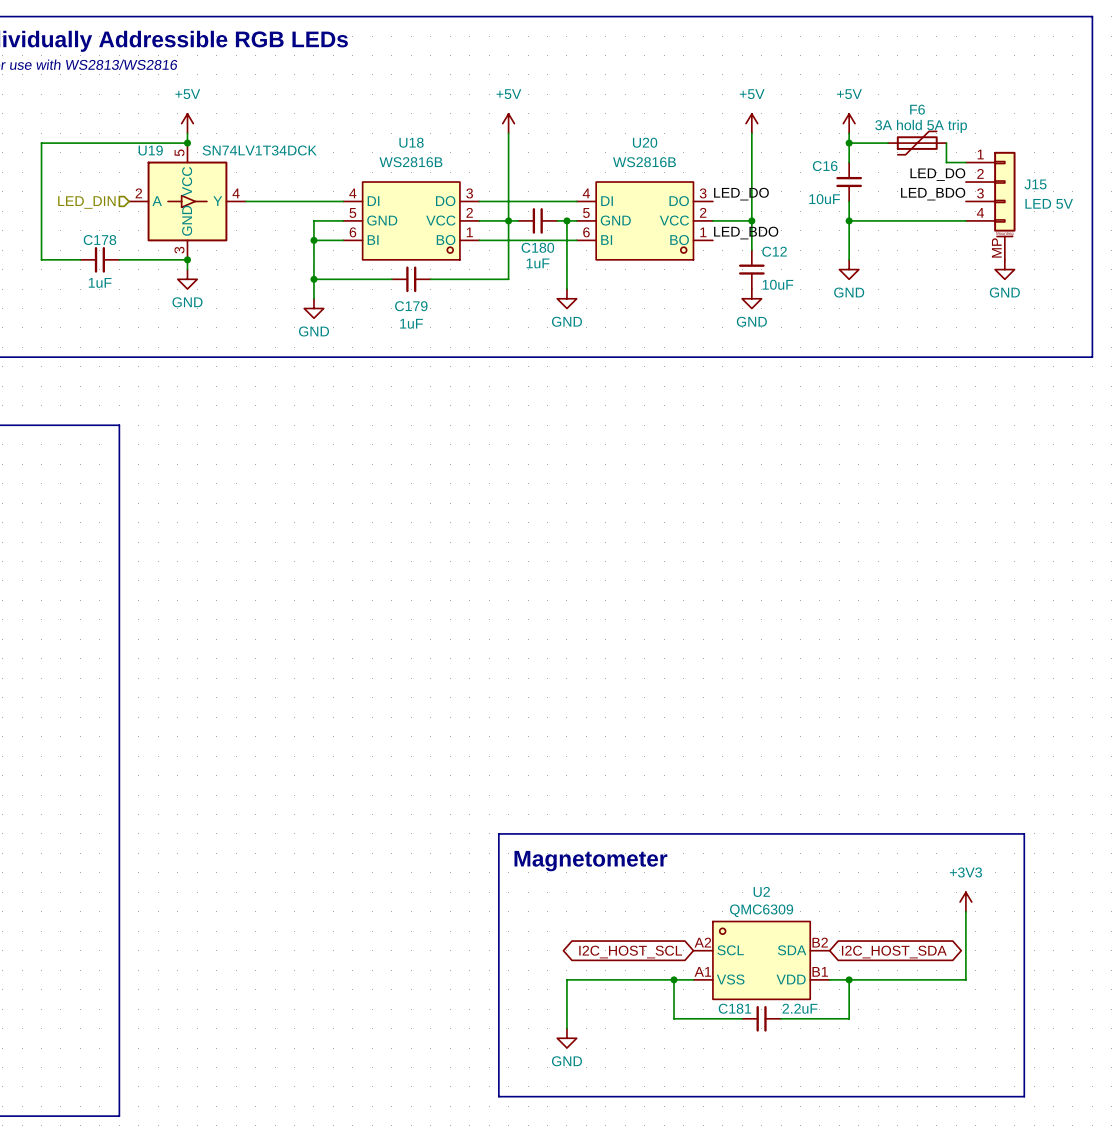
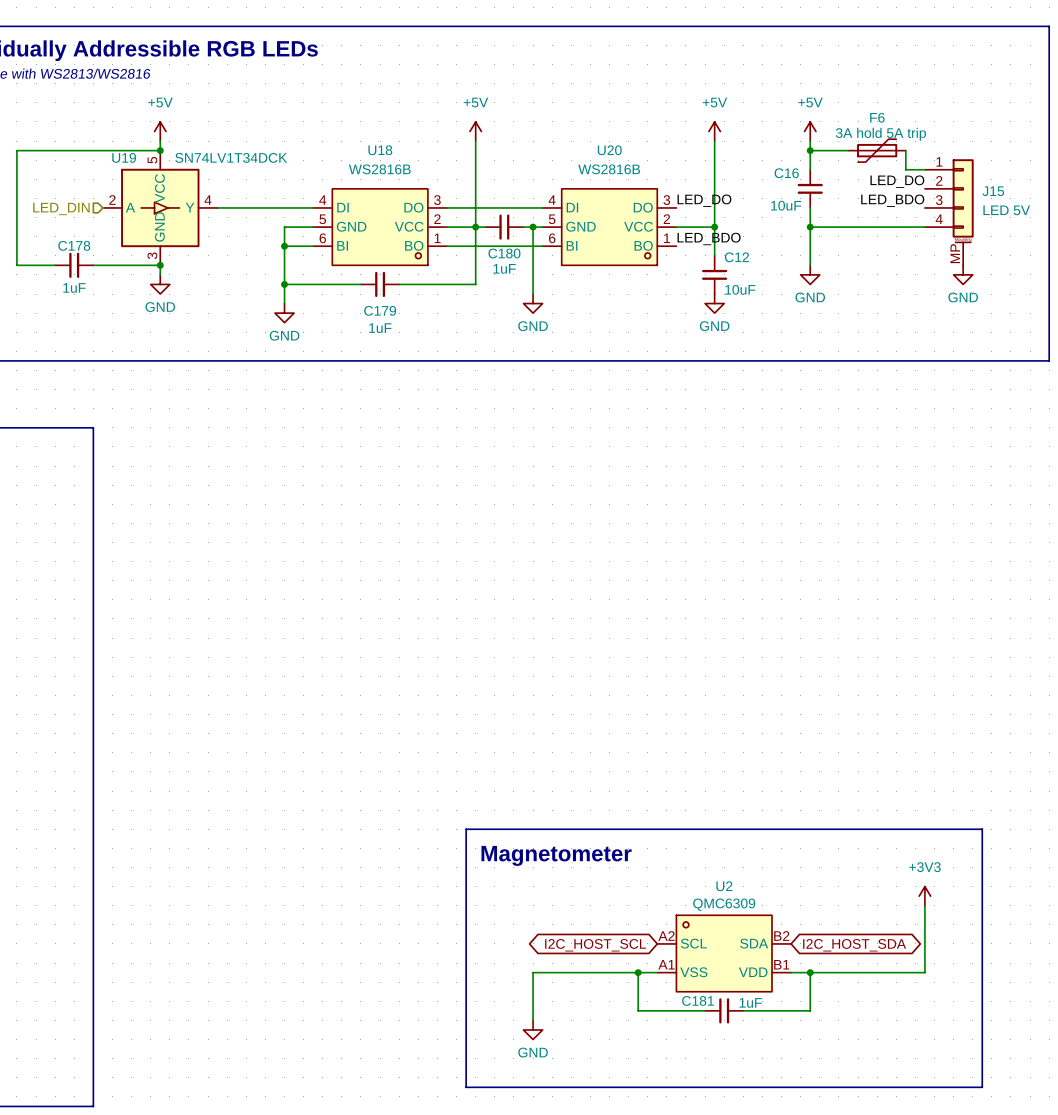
C181 value: 2.2uF (800, 1008) -> 1uF (750, 1002)

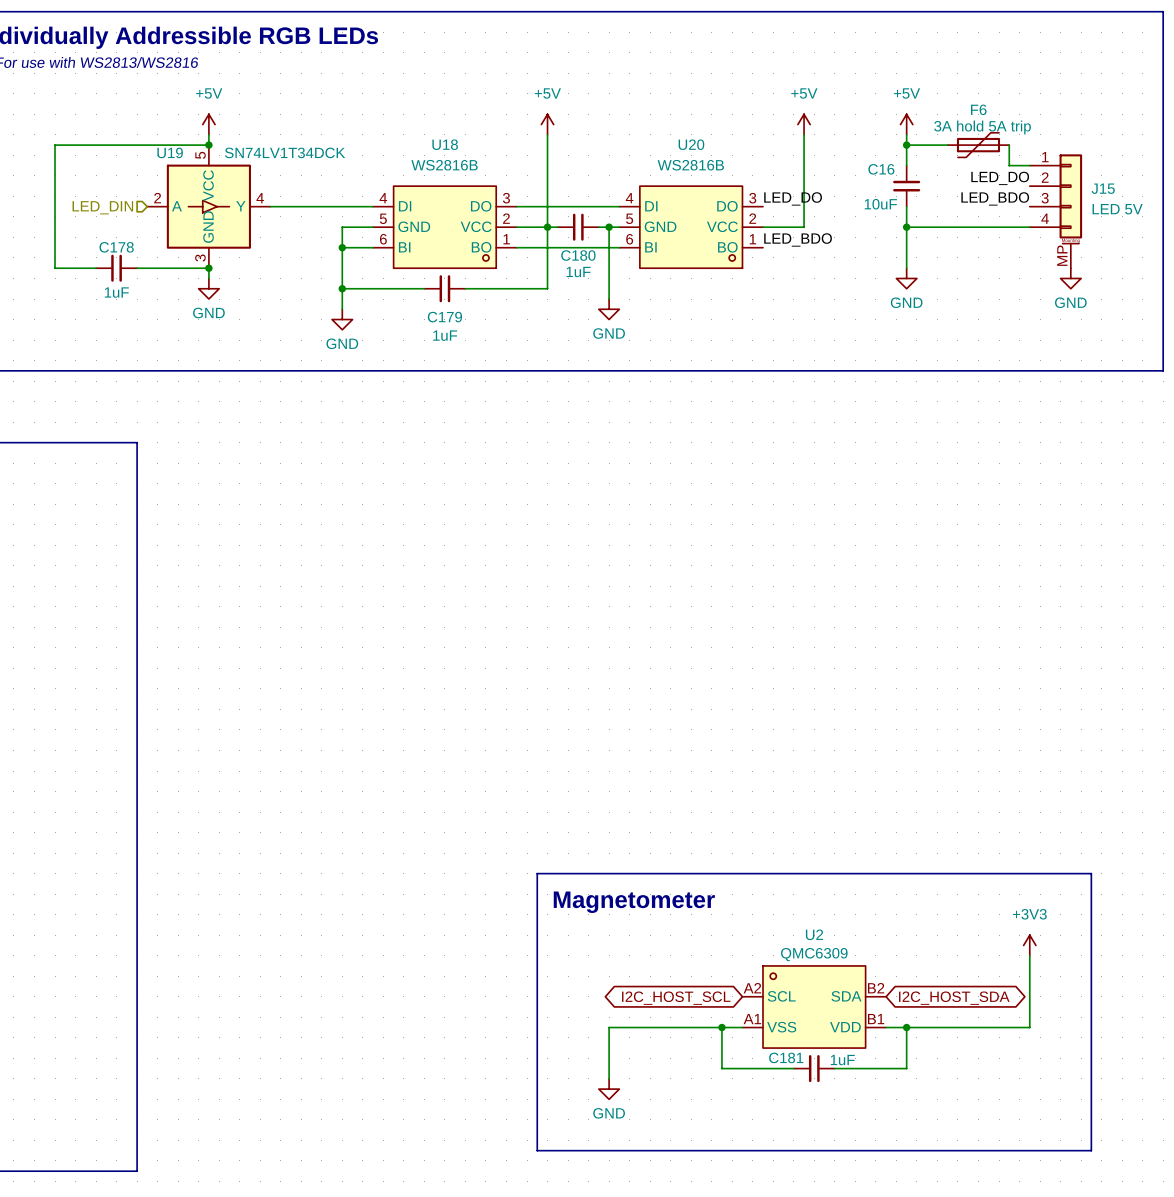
wire: (714, 227) (714, 255) -> none
junction: (714, 227) -> none
C12: 10uF (714, 274) -> none
power symbol: GND (714, 303) -> none

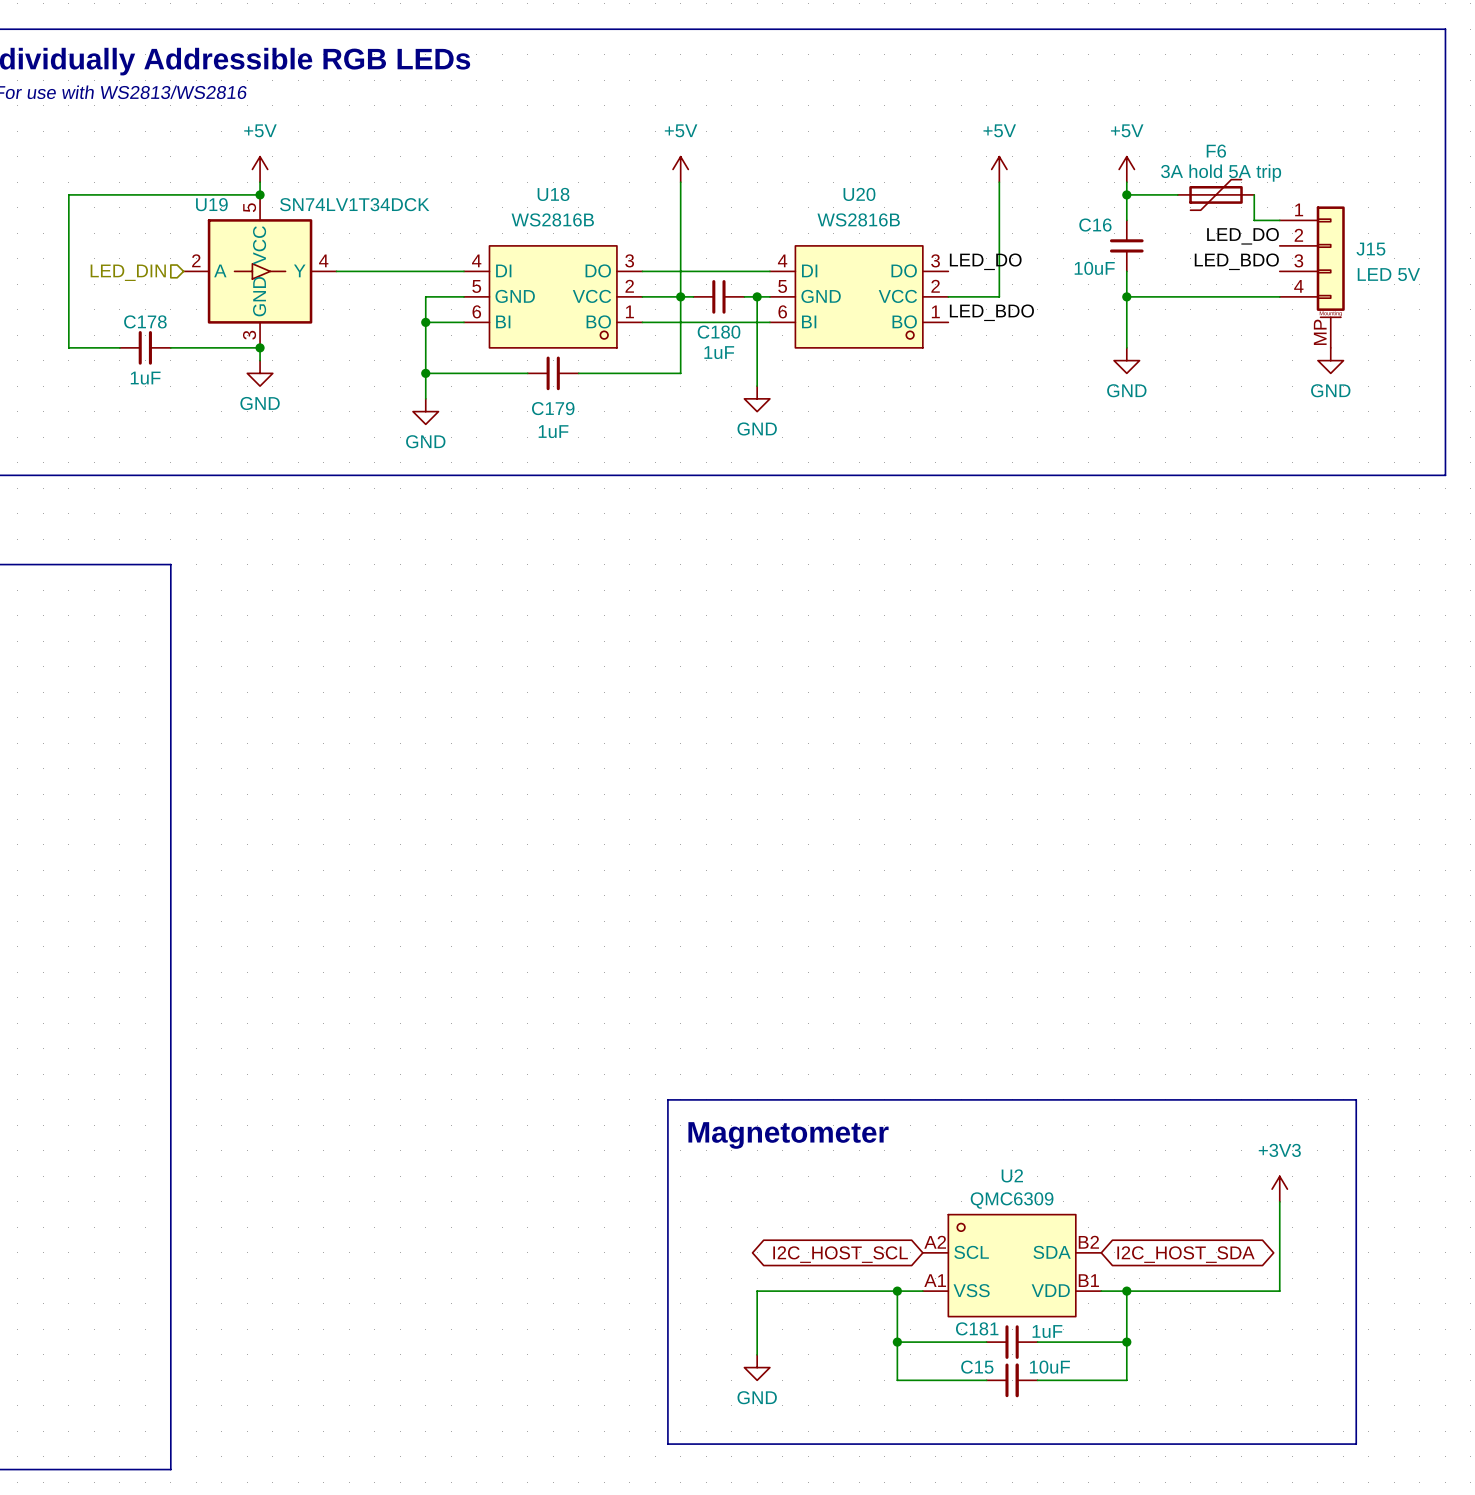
wire: none -> (897, 1342) (897, 1380) (986, 1380)
junction: none -> (897, 1342)
wire: none -> (1126, 1342) (1126, 1380) (1037, 1380)
junction: none -> (1126, 1342)
C15: none -> 10uF (1012, 1380)

